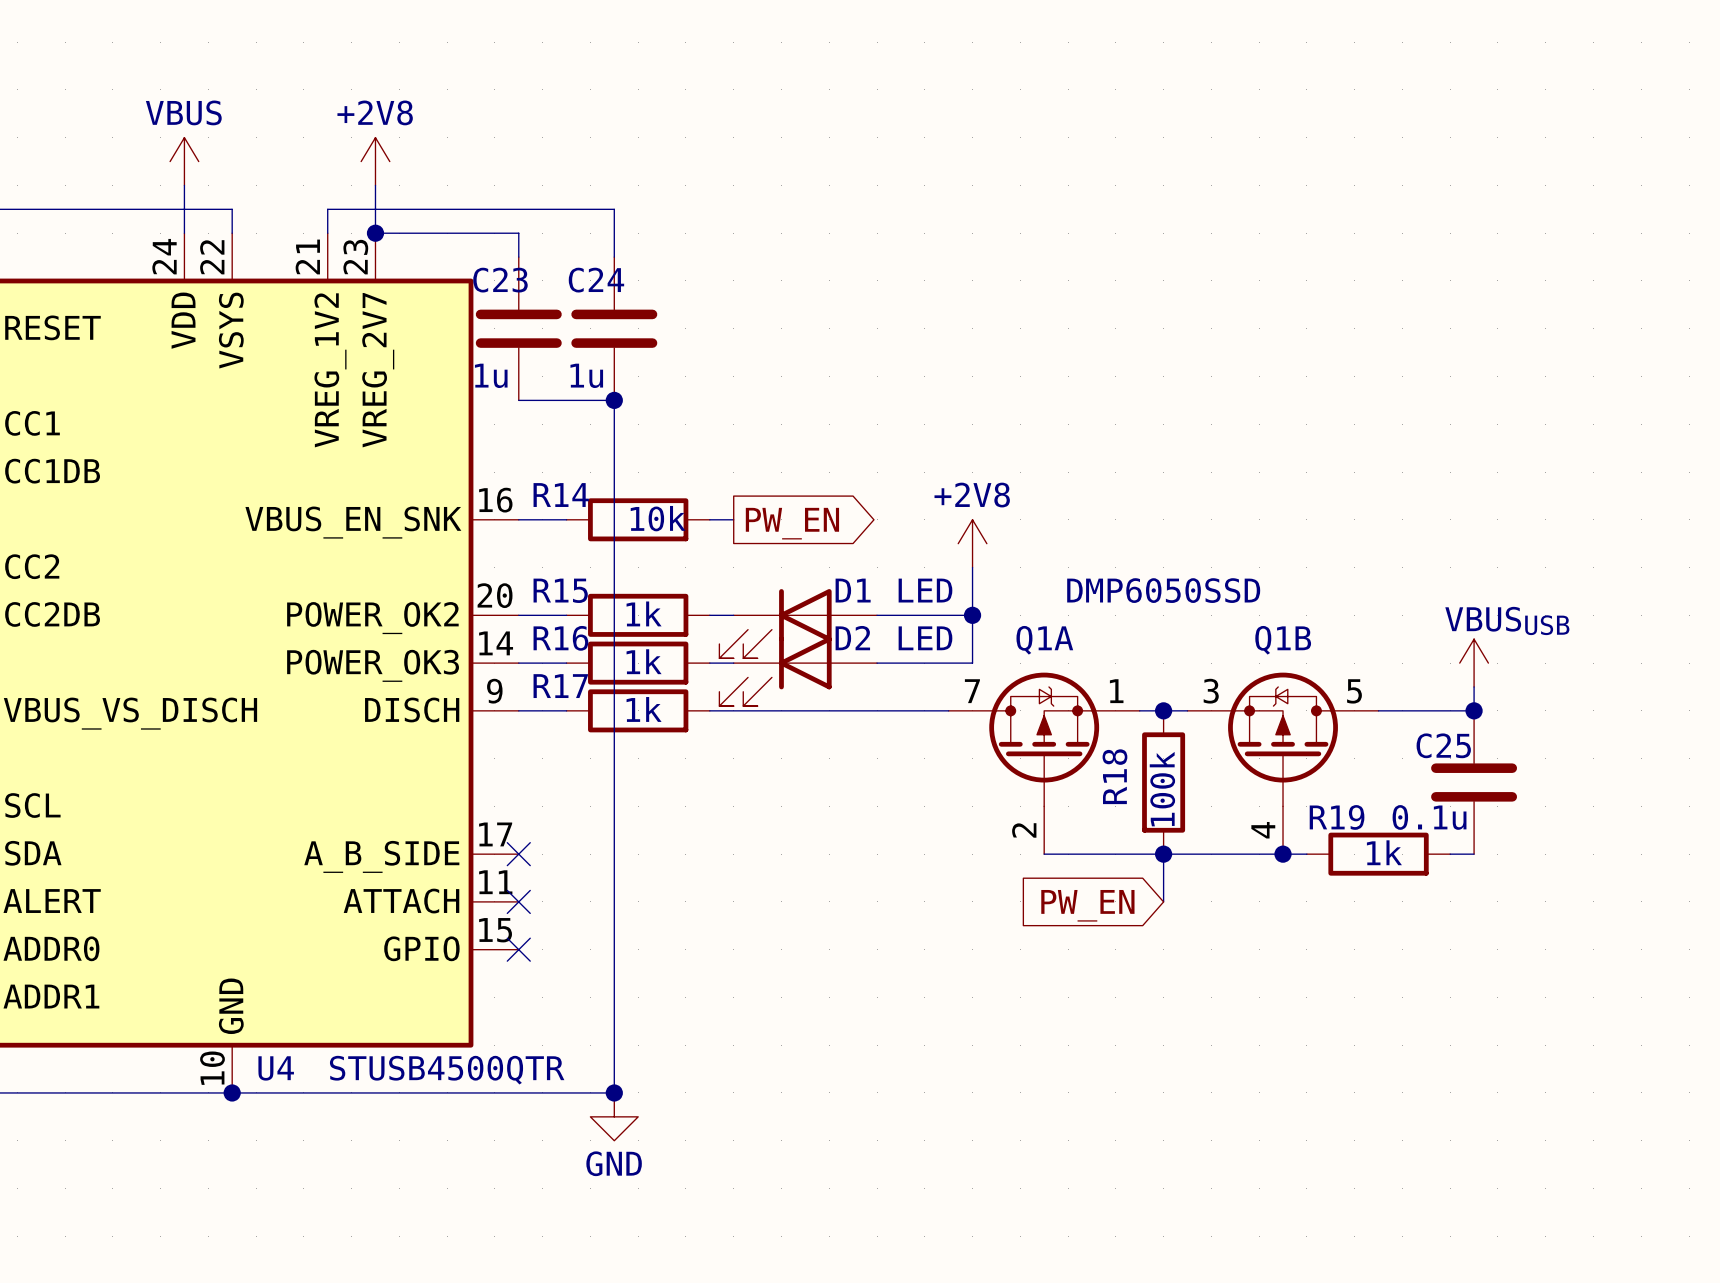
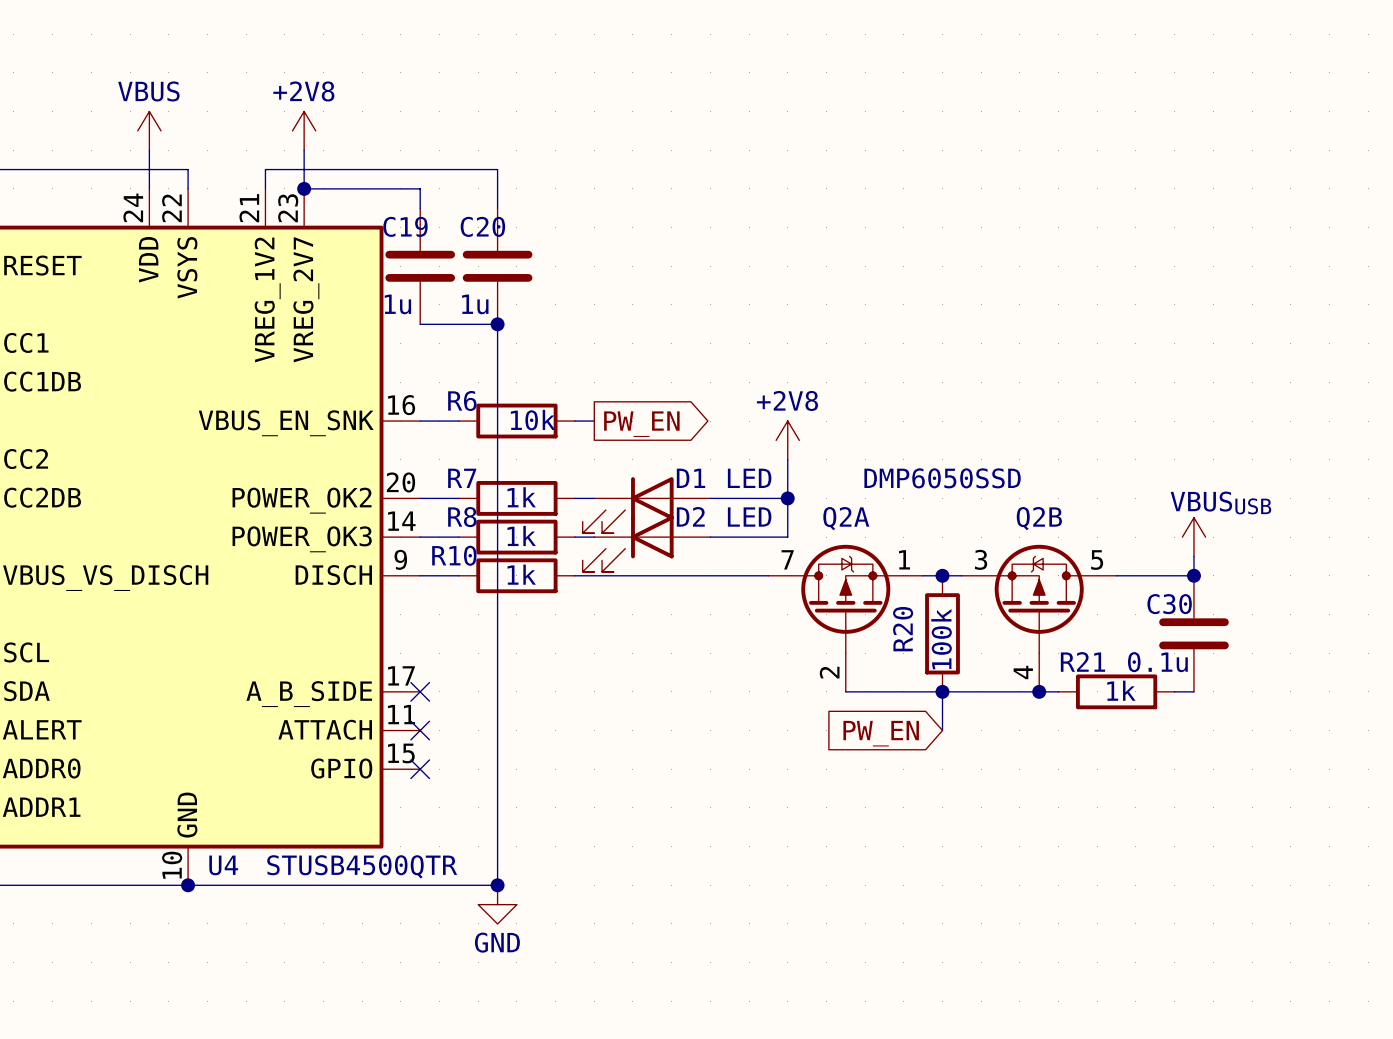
C23 name: C23 (500, 280) -> C19 (405, 226)
C24 name: C24 (596, 280) -> C20 (482, 226)
R14 name: R14 (561, 495) -> R6 (462, 400)
R15 name: R15 (560, 590) -> R7 (462, 478)
R16 name: R16 (560, 638) -> R8 (462, 517)
Q1A name: Q1A (1044, 640) -> Q2A (846, 518)
Q1B name: Q1B (1283, 640) -> Q2B (1039, 518)
R17 name: R17 (560, 686) -> R10 (454, 555)
C25 name: C25 (1443, 745) -> C30 (1169, 604)
R18 name: R18 (1114, 776) -> R20 (903, 629)
R19 name: R19 (1337, 817) -> R21 (1082, 661)

